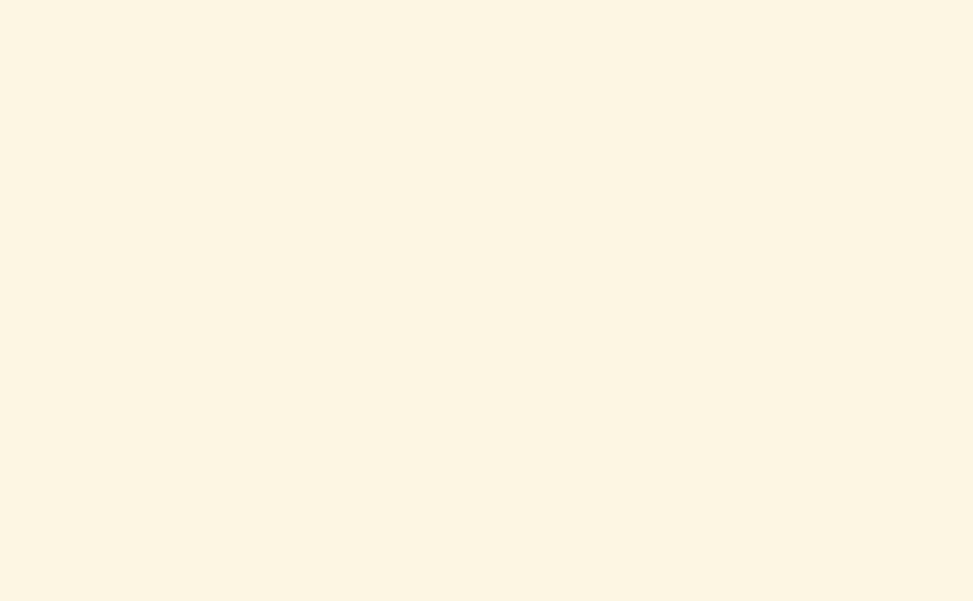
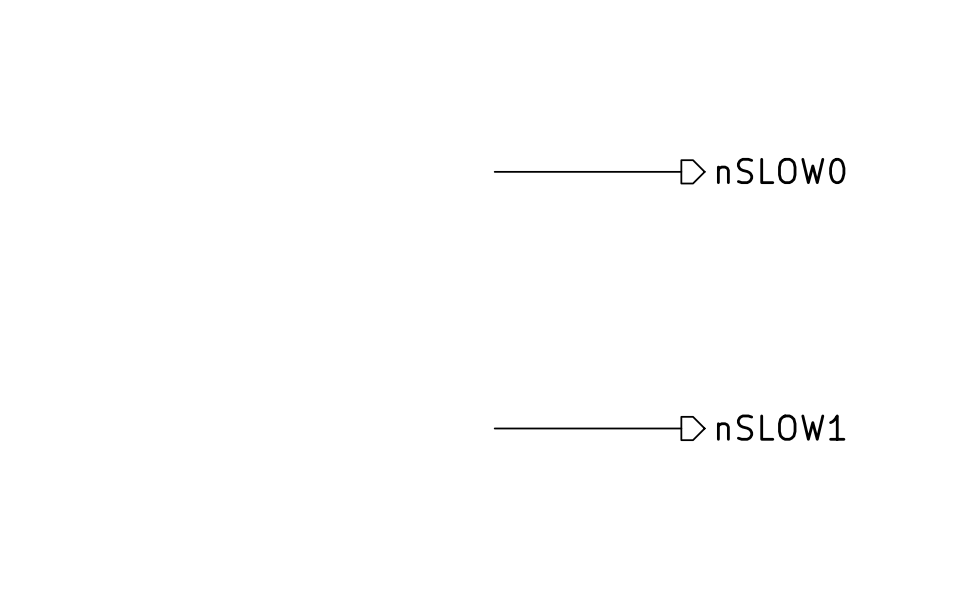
hierarchical label: none -> nSLOW0 (781, 170)
wire: none -> (494, 171) (681, 171)
hierarchical label: none -> nSLOW1 (781, 427)
wire: none -> (494, 428) (681, 428)

